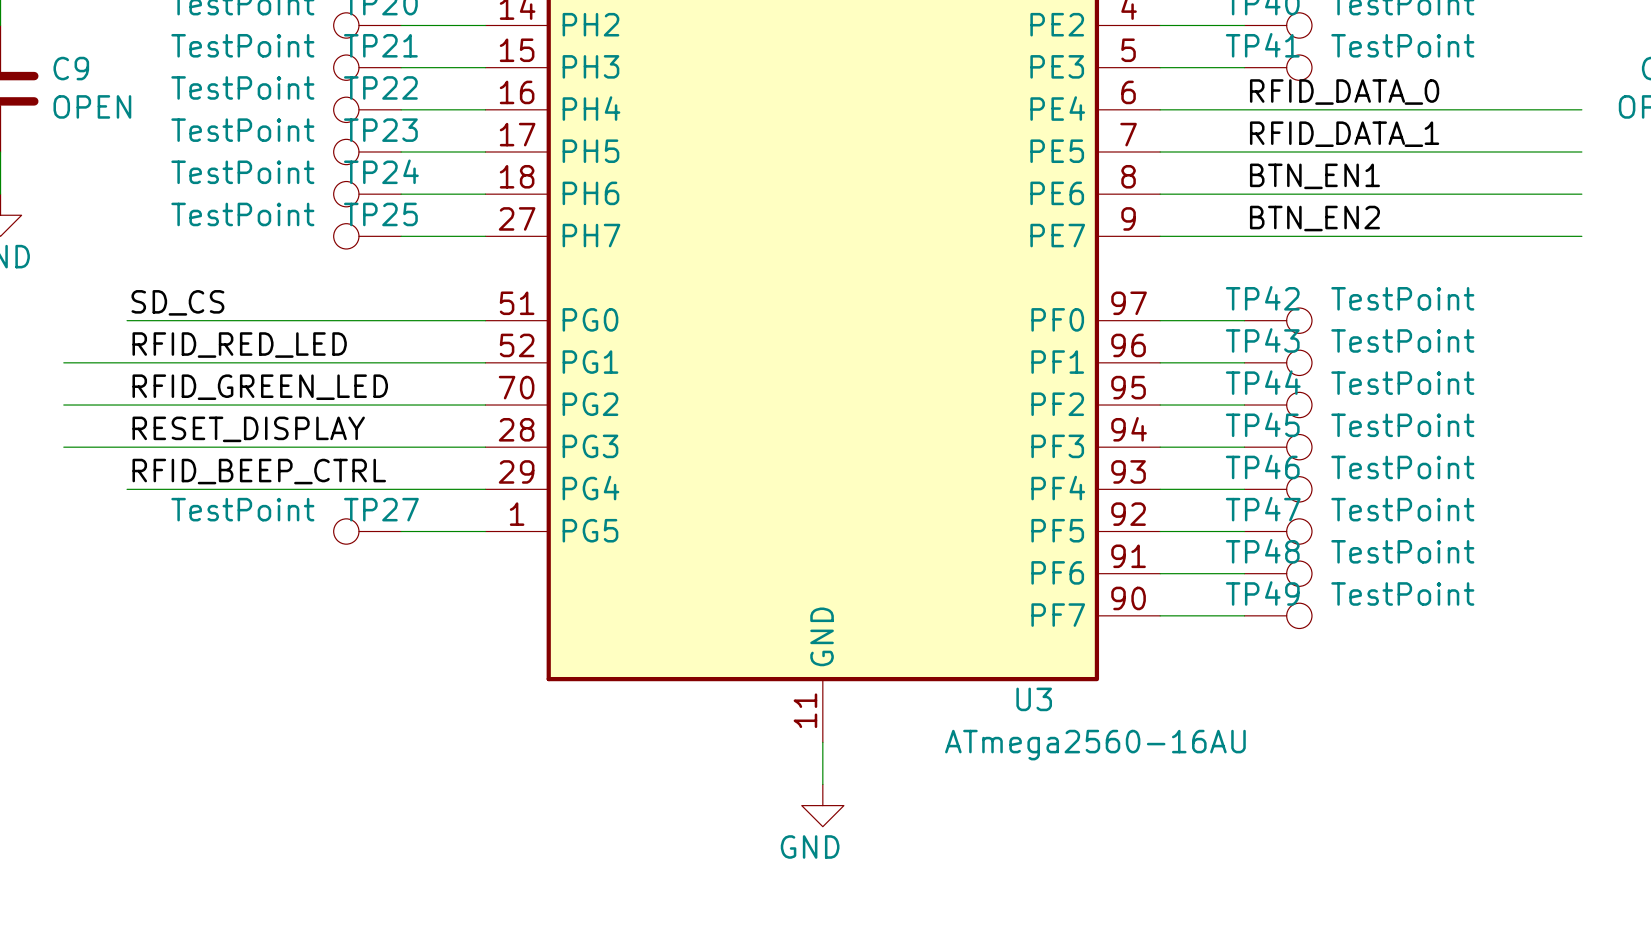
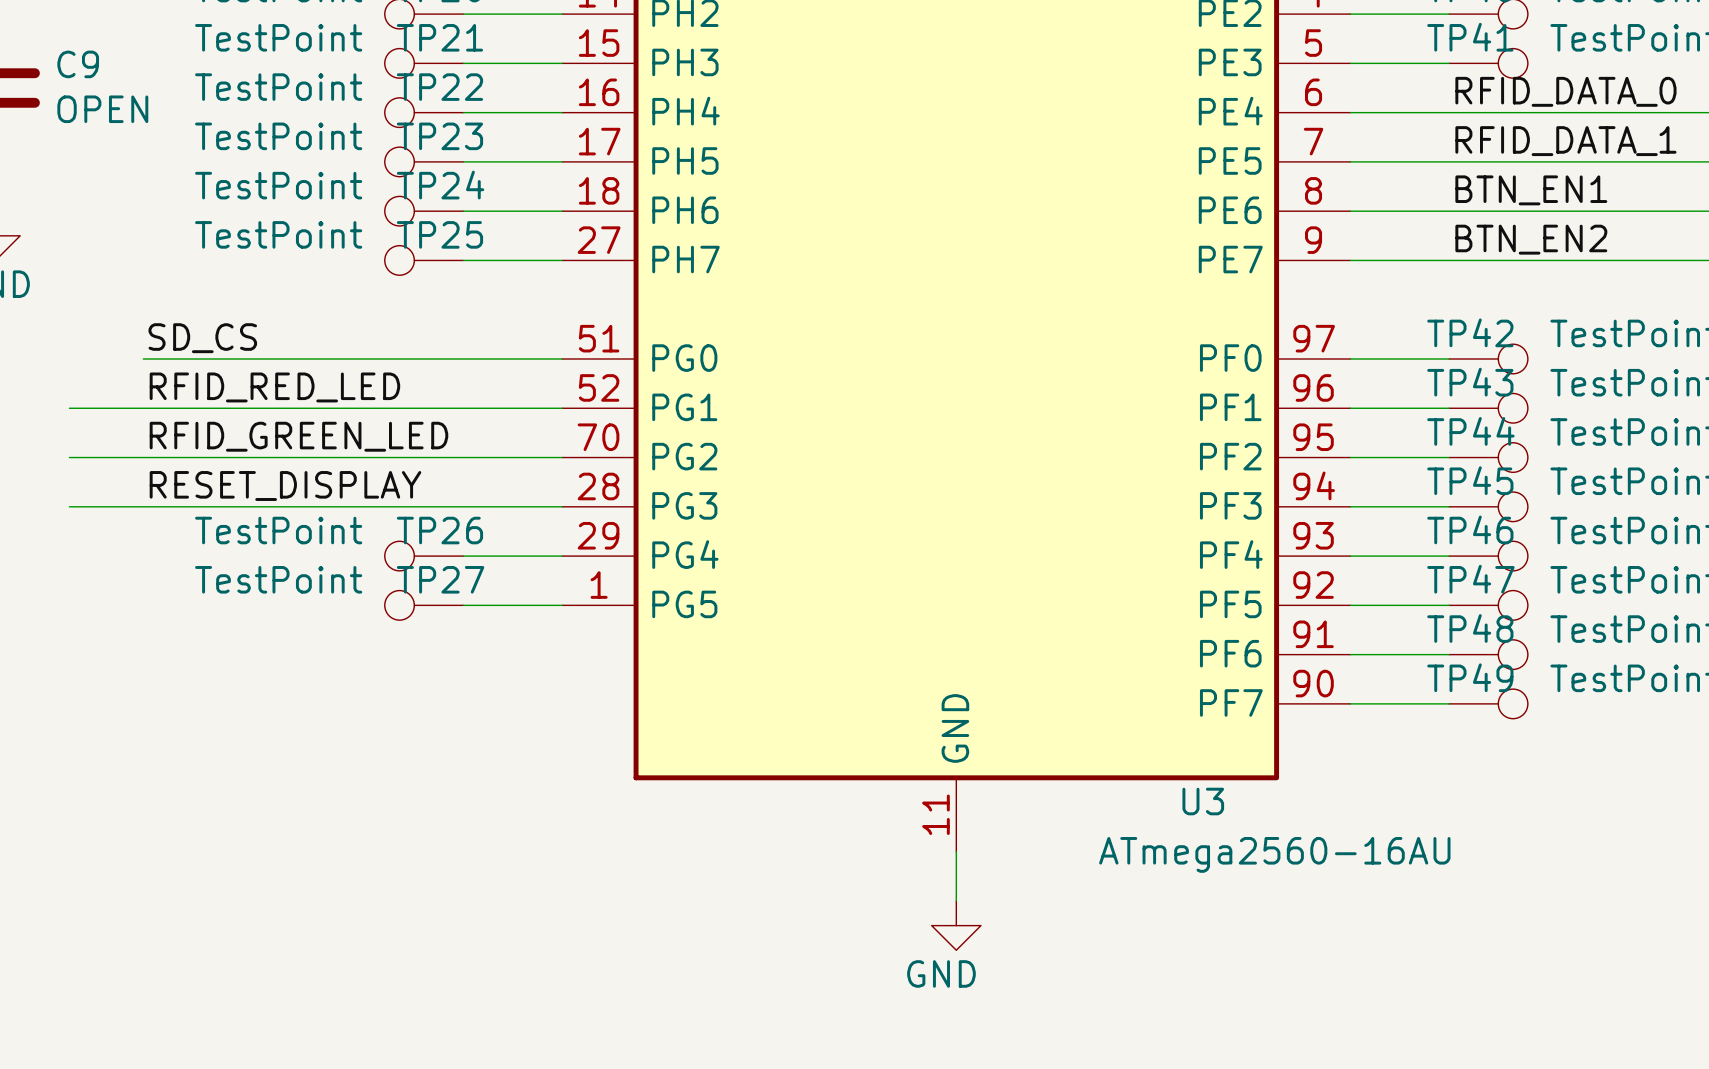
label: RFID_BEEP_CTRL (259, 471) -> none
wire: (127, 489) (401, 489) -> none
TP26: none -> TestPoint (424, 556)

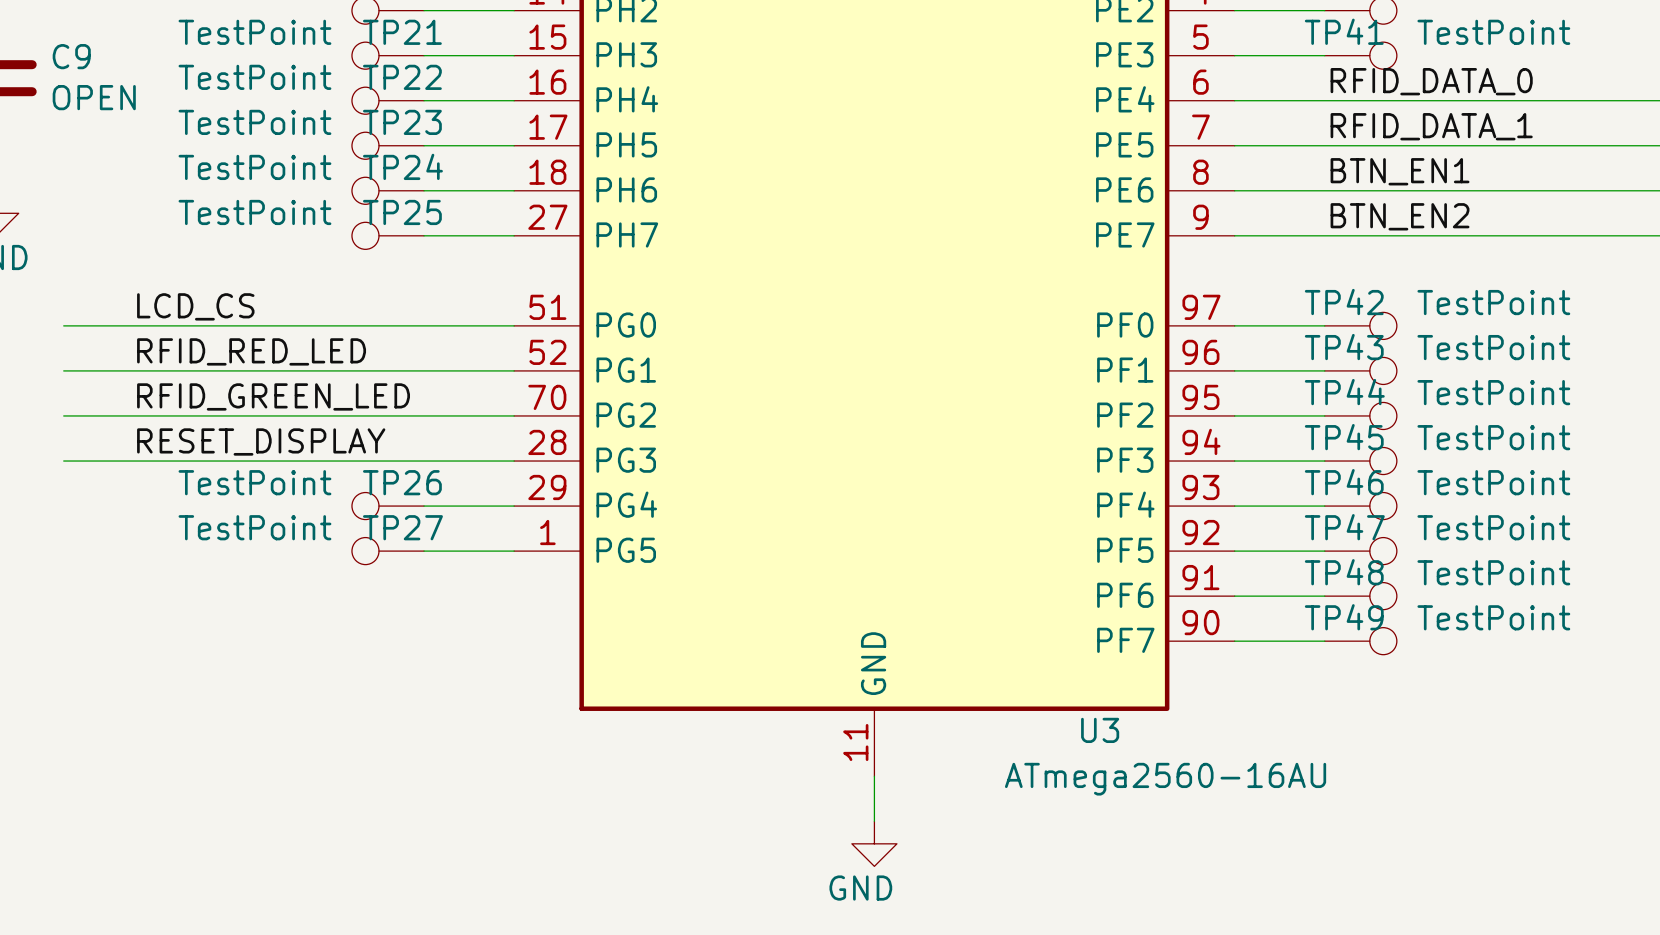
label: SD_CS (202, 338) -> LCD_CS (195, 306)
wire: none -> (63, 325) (131, 325)

